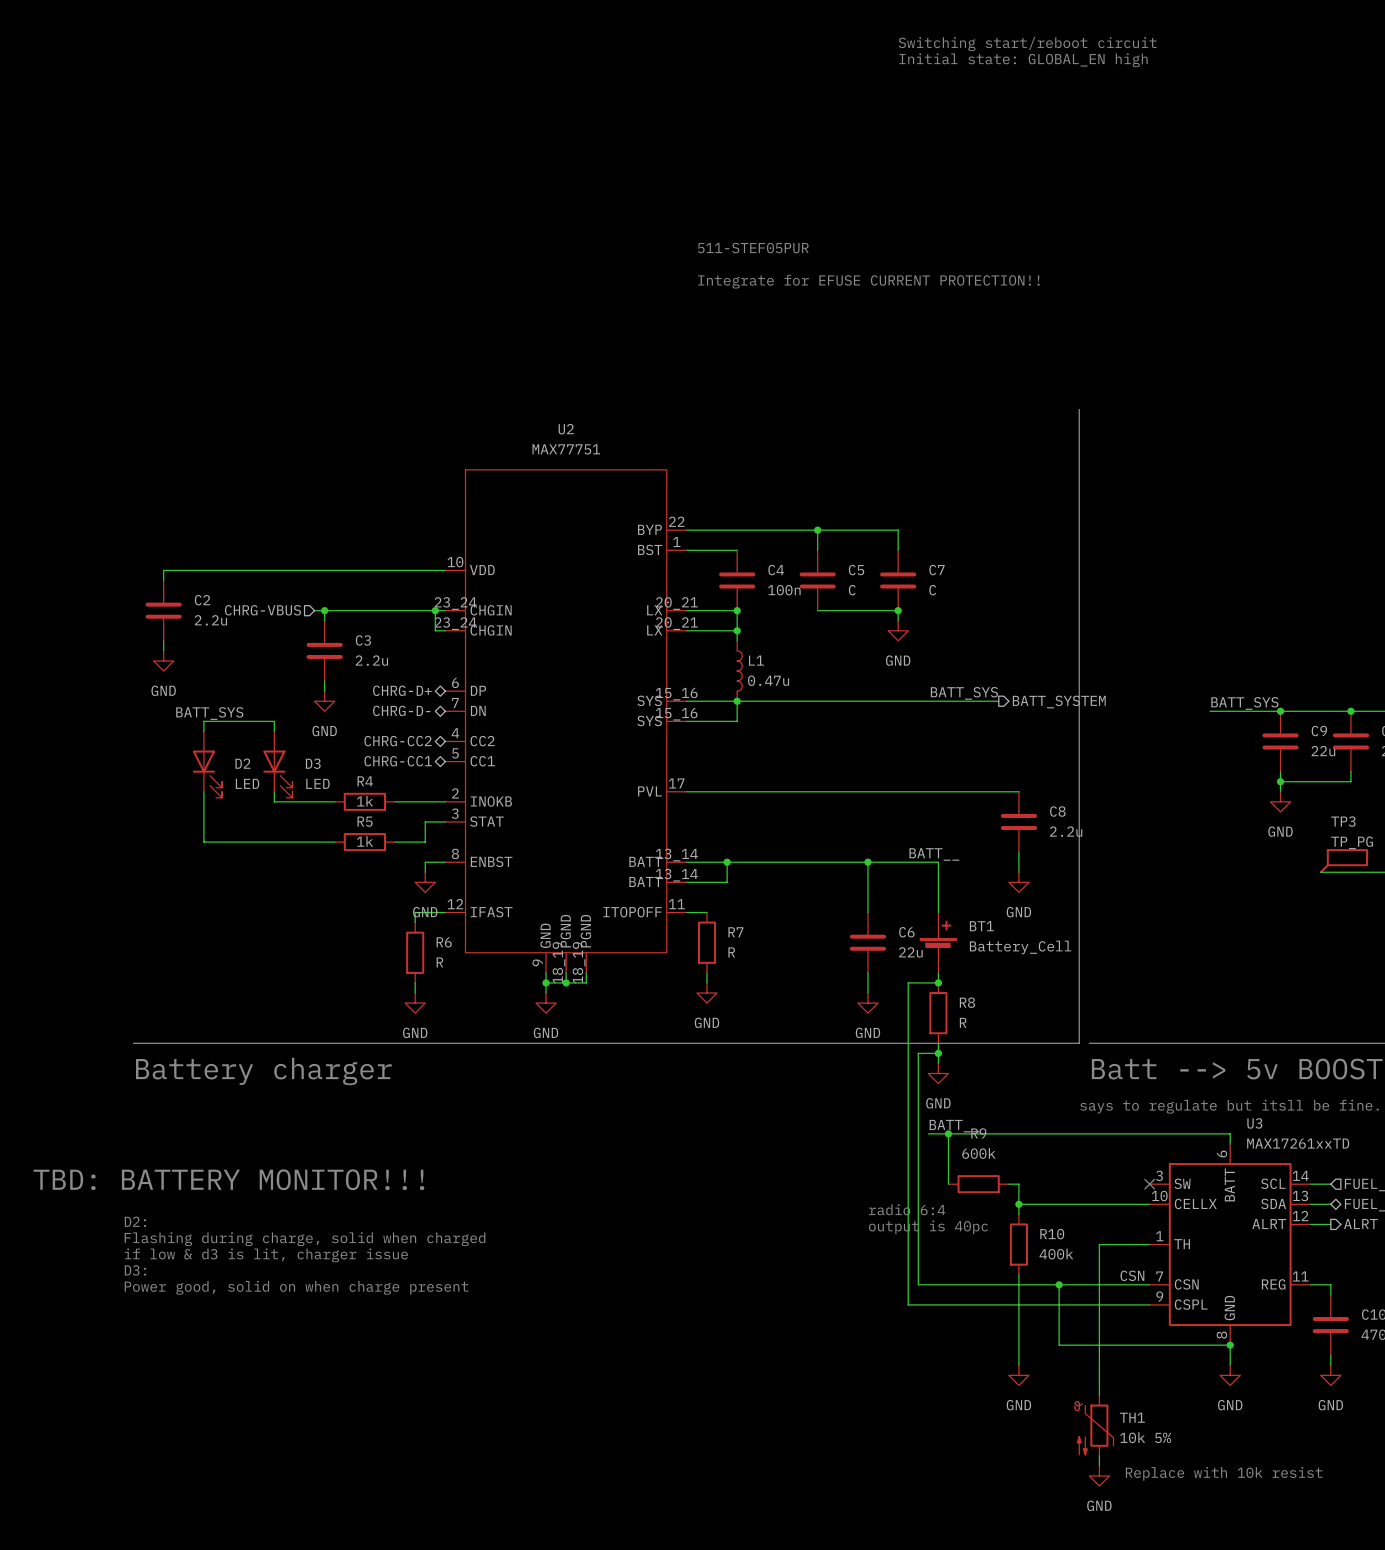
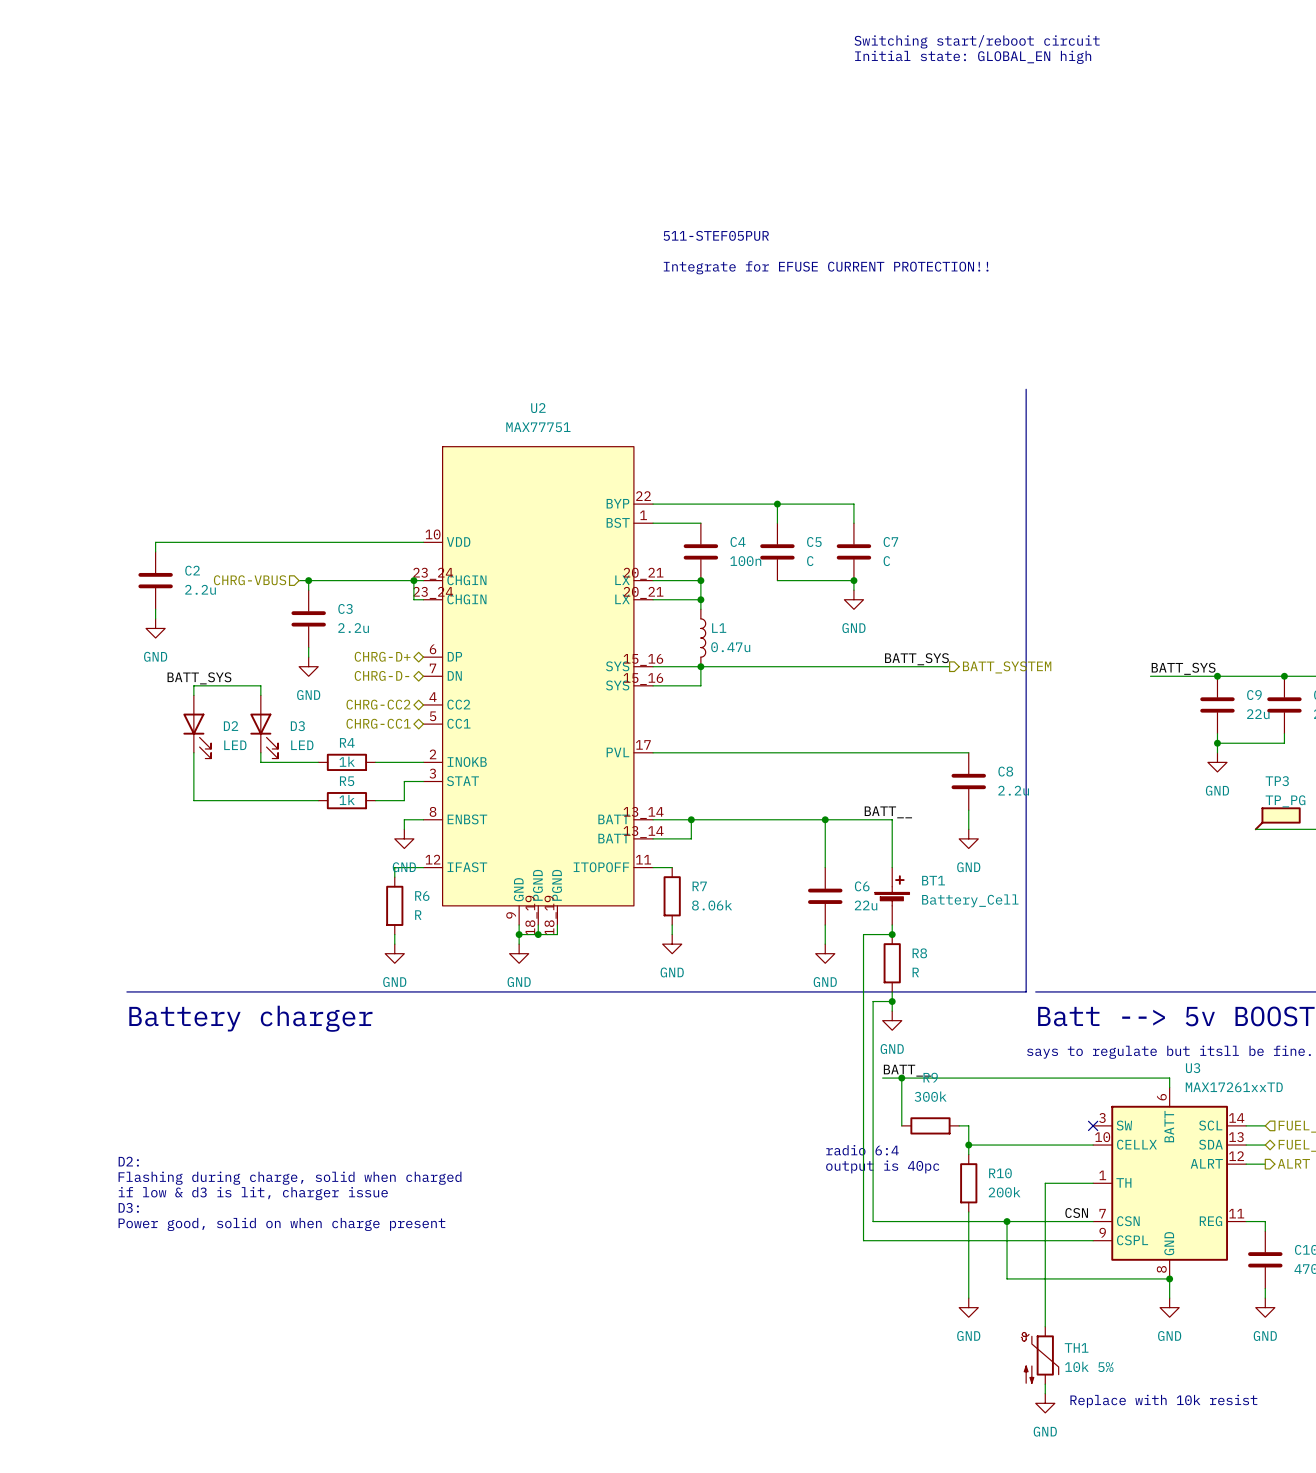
R7 value: R (731, 952) -> 8.06k (712, 905)
R9 value: 600k (978, 1153) -> 300k (930, 1096)
text: TBD: BATTERY MONITOR!!! (228, 1179) -> none
R10 value: 400k (1056, 1254) -> 200k (1004, 1192)

